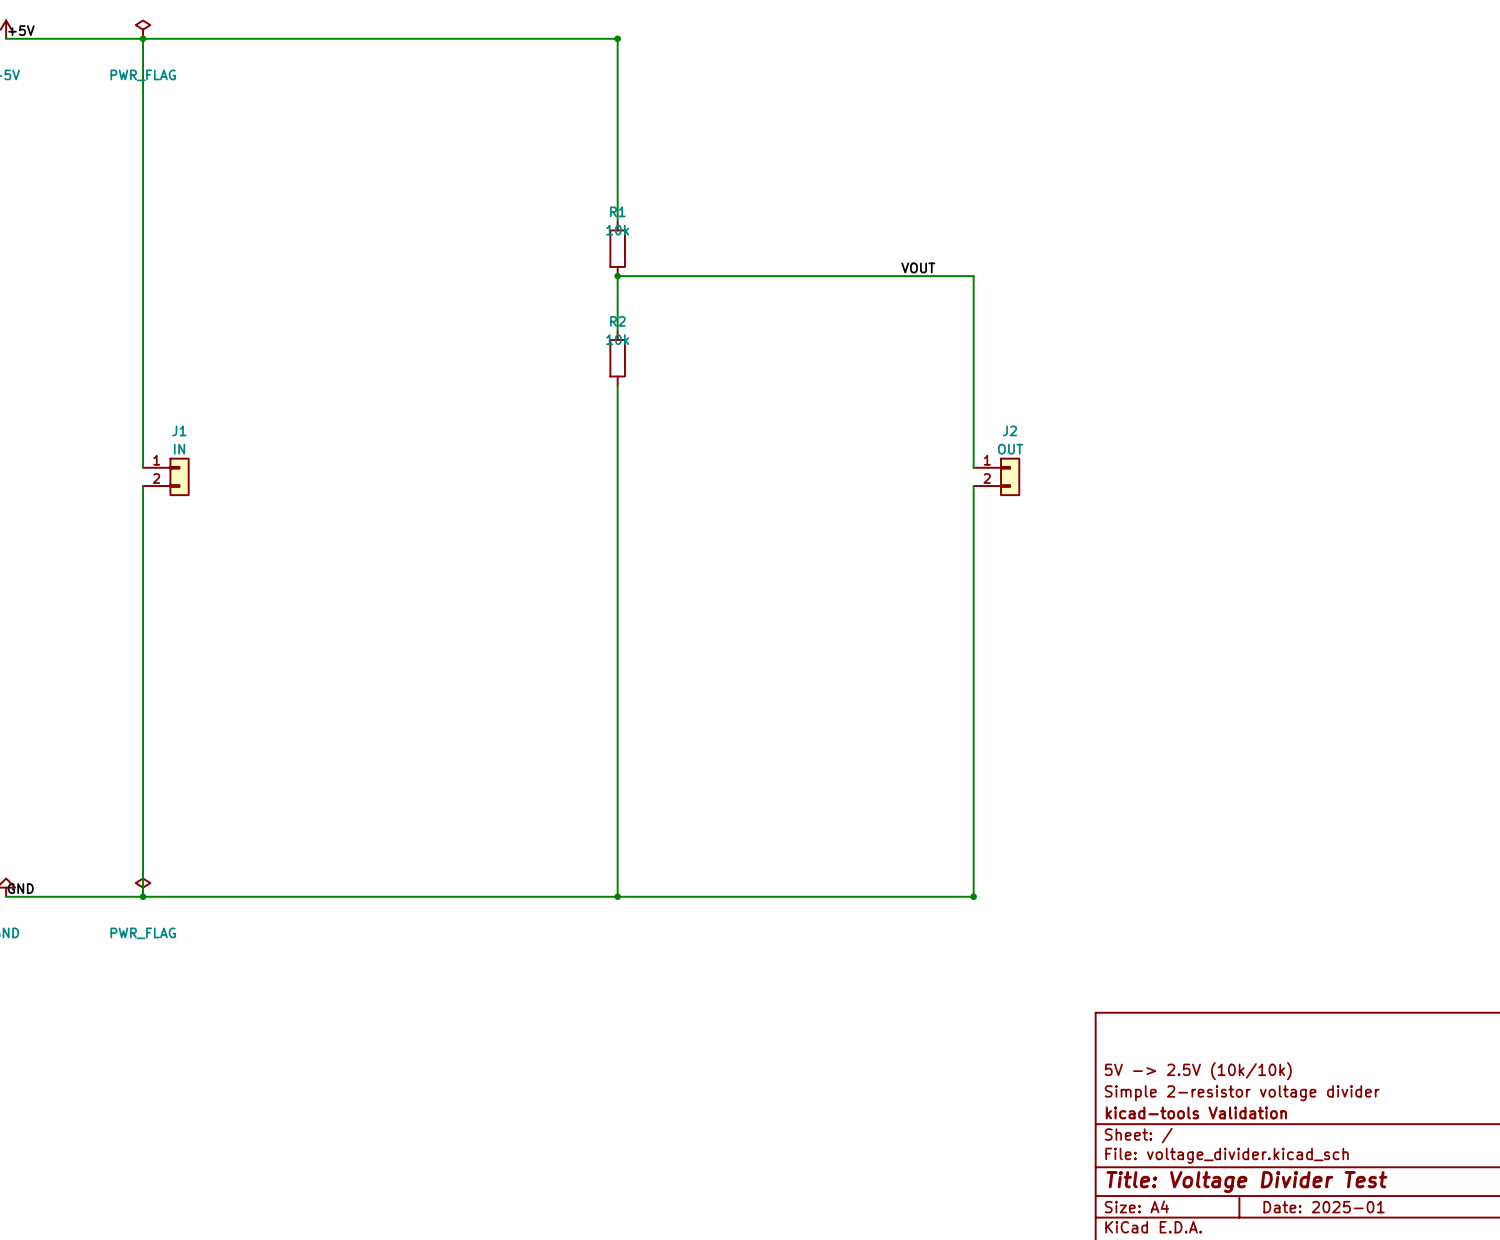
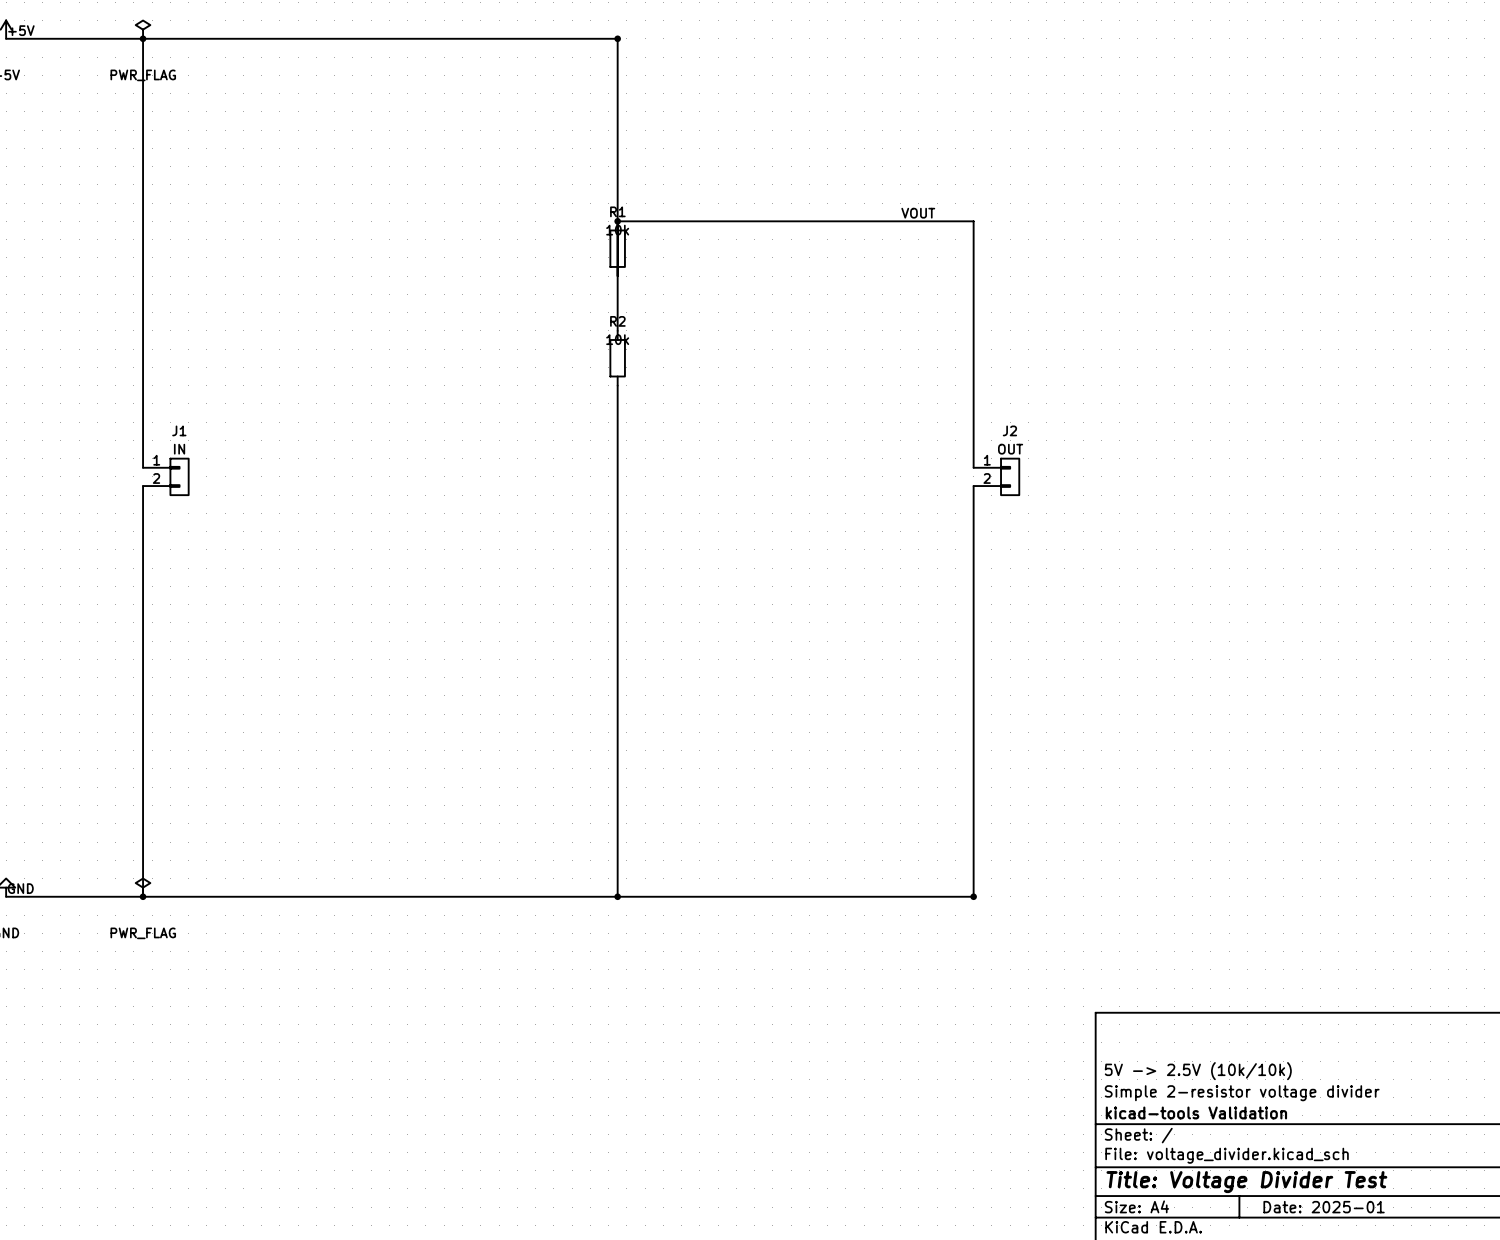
junction: none -> (617, 221)
label position: VOUT (918, 267) -> VOUT (918, 213)
wire: (617, 276) (973, 276) -> (617, 276) (617, 221) (973, 221) (973, 276)
junction: (617, 276) -> none

